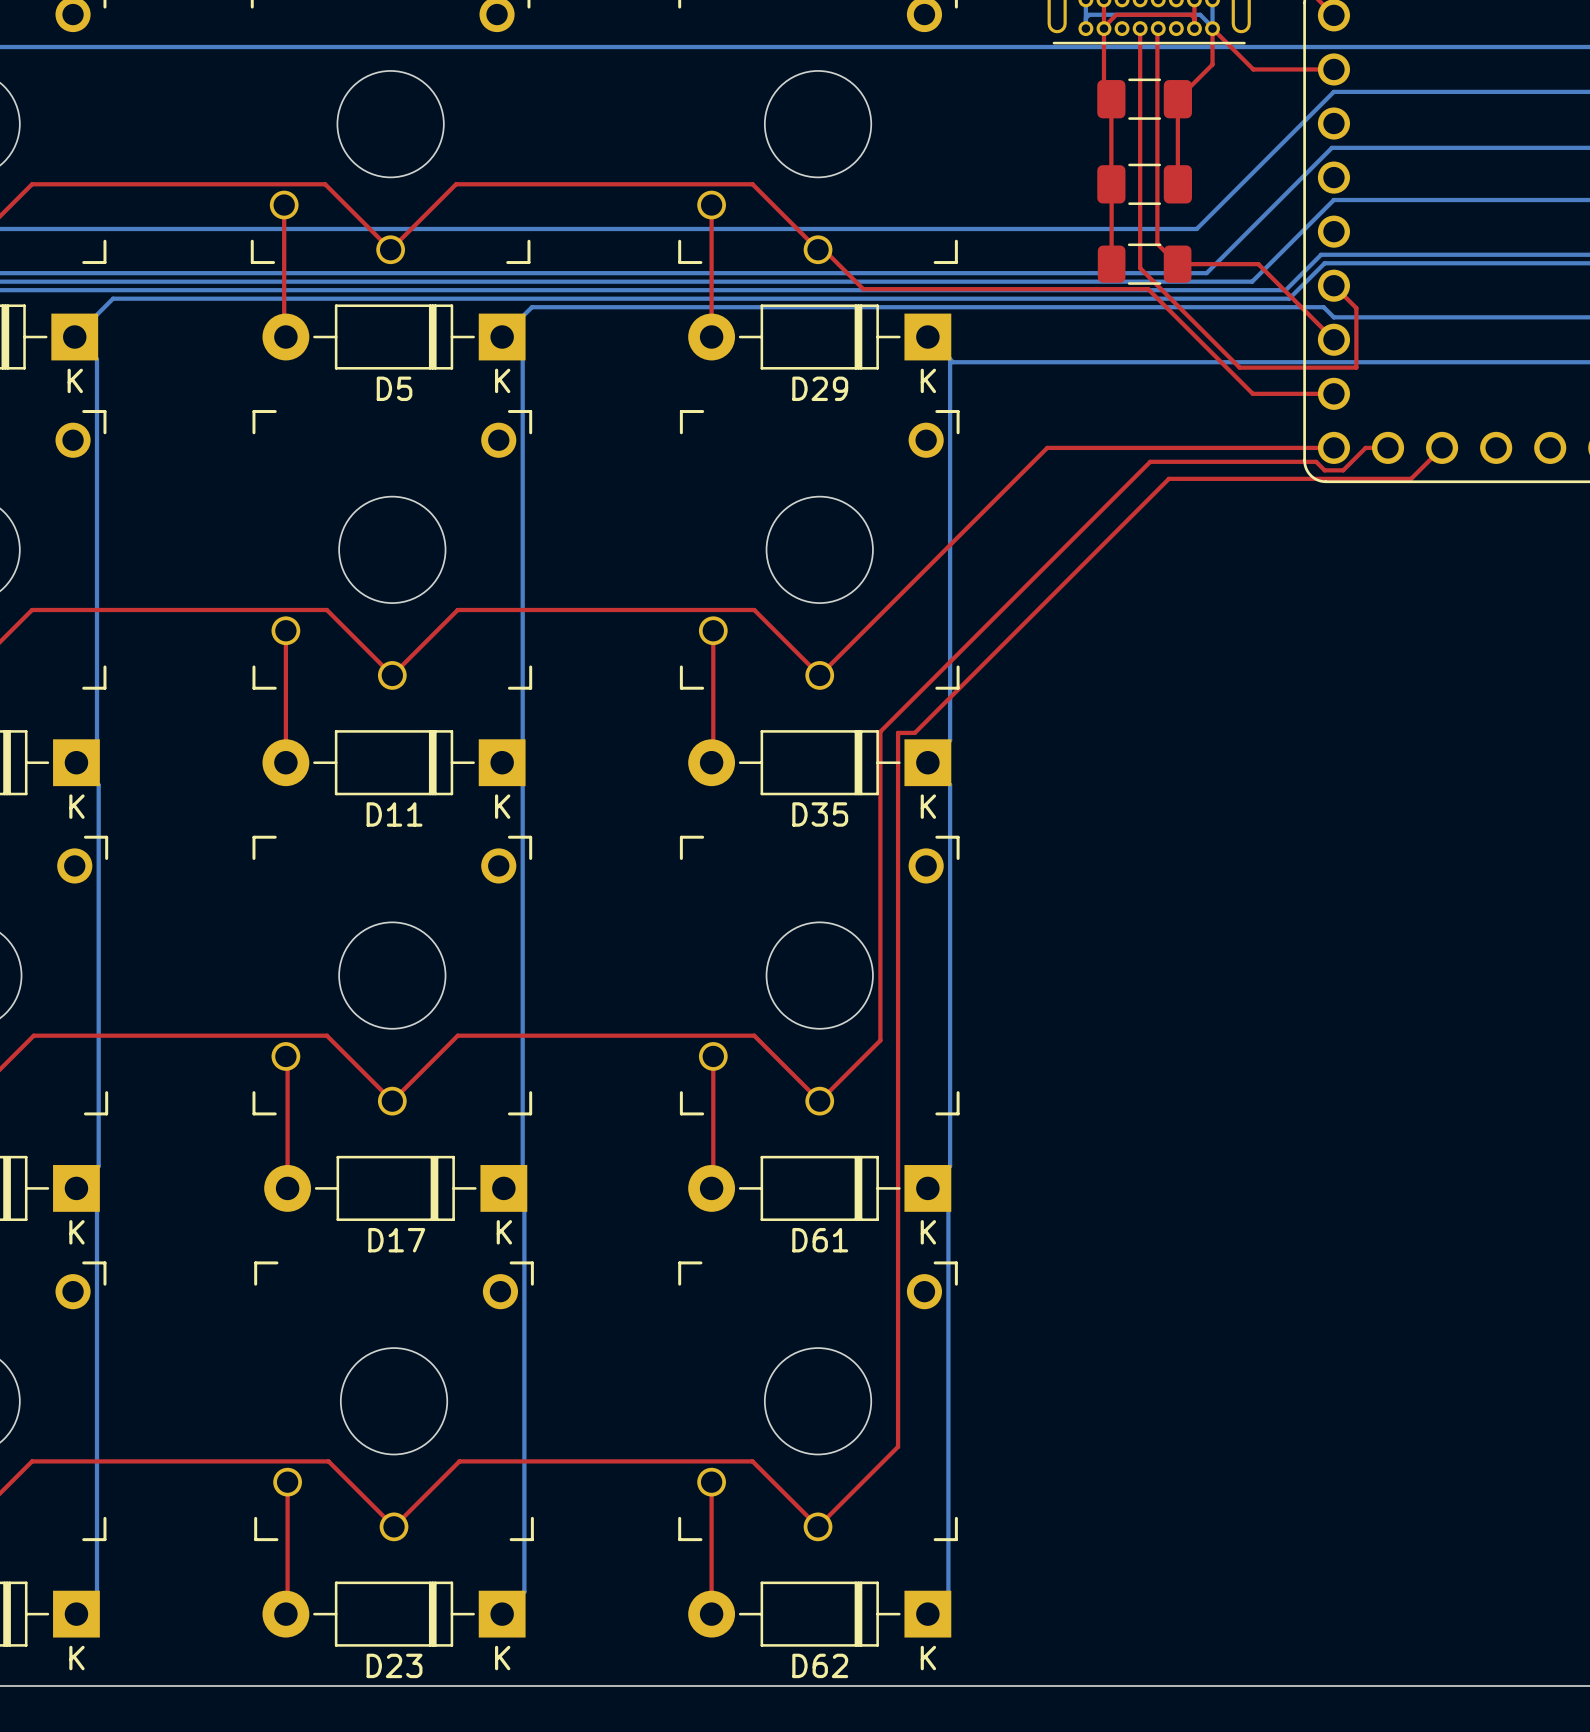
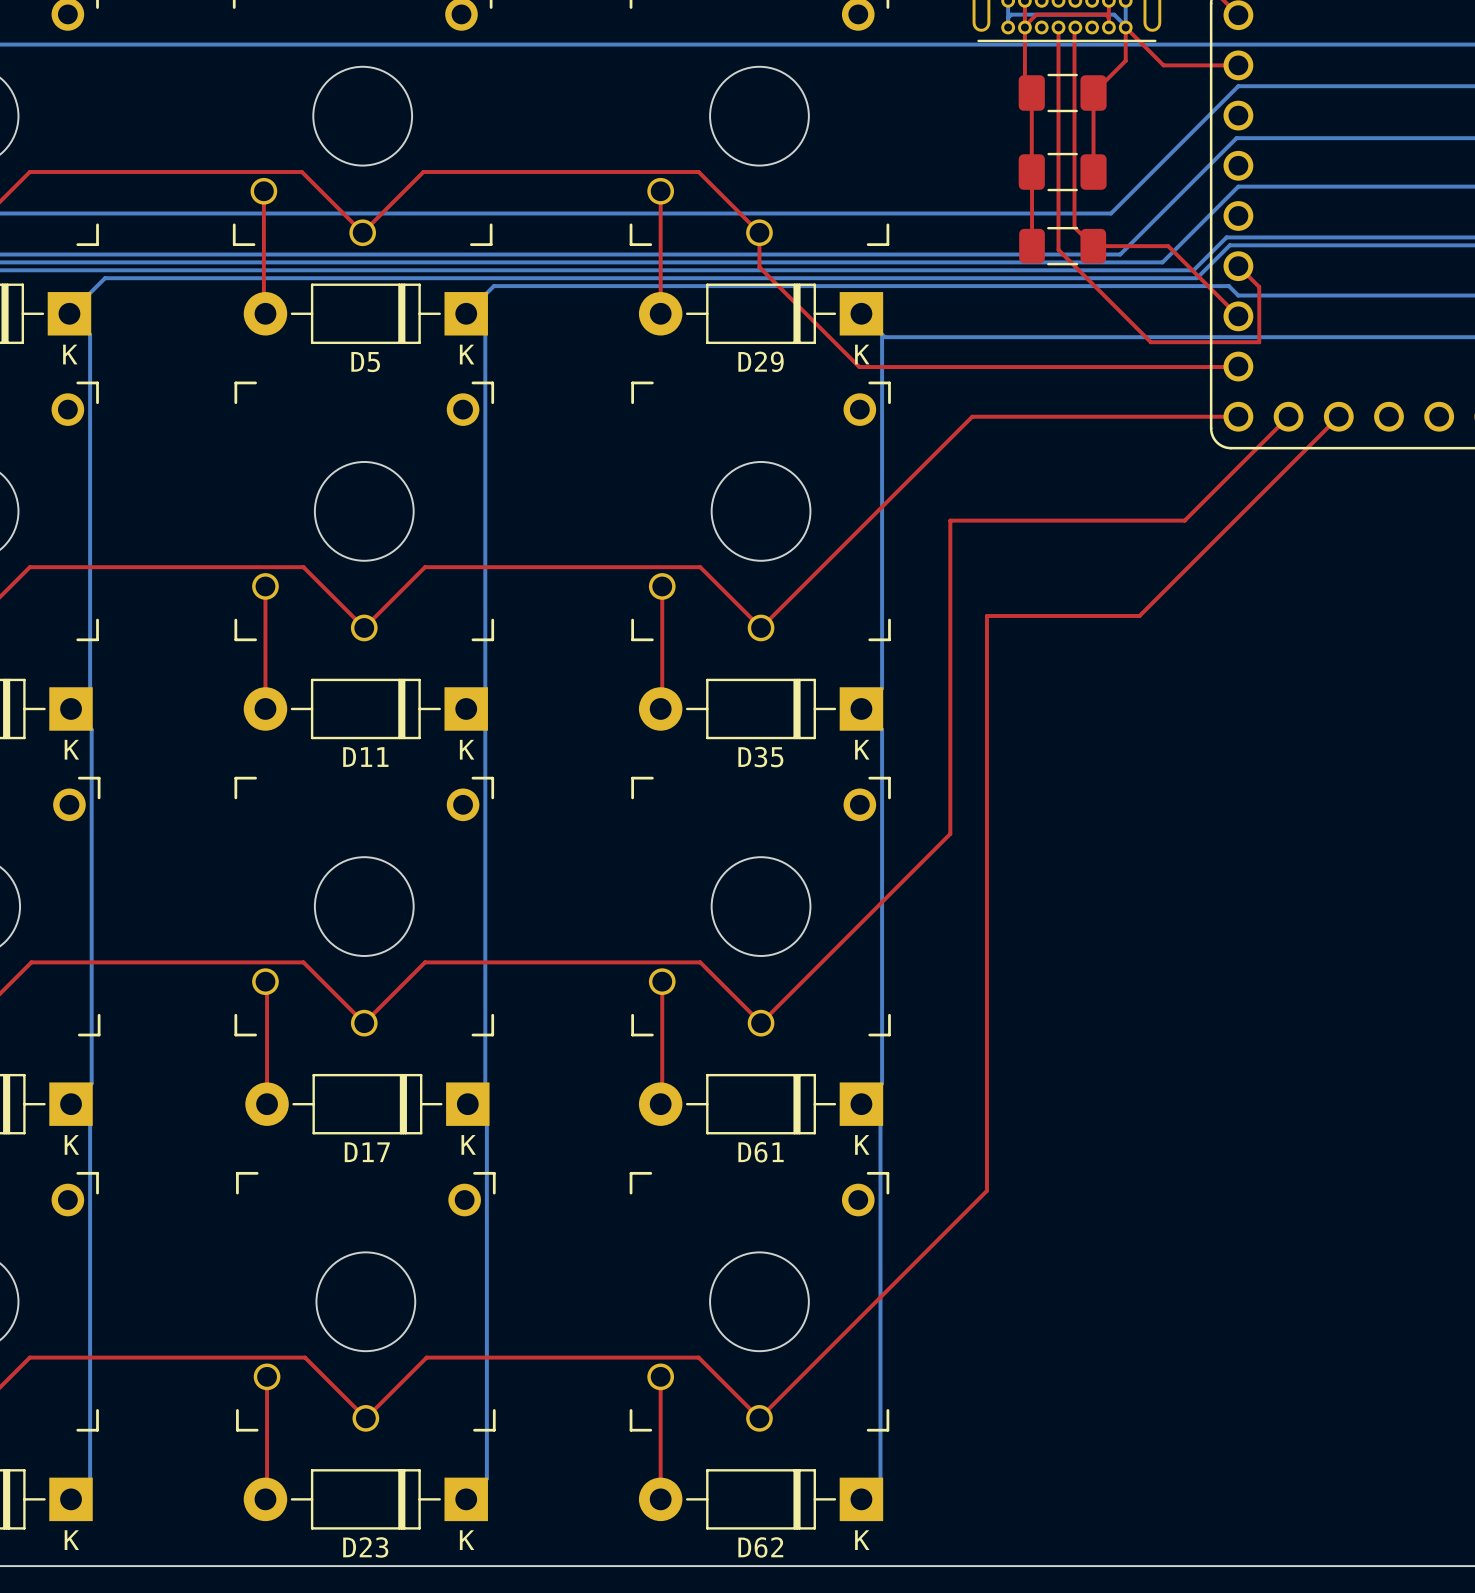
top track: (818, 249) (823, 249) (863, 289) (1148, 289) (1252, 393) (1333, 393) -> (759, 232) (759, 267) (859, 367) (1238, 366)
top track: (1388, 447) (1365, 447) (1343, 470) (1324, 470) (1316, 461) (1150, 461) (880, 731) (880, 1040) -> (1288, 416) (1184, 520) (950, 520) (950, 833) (817, 966)
top track: (1411, 478) (1168, 478) (914, 732) (898, 732) (898, 1446) -> (1310, 445) (1139, 615) (986, 615) (986, 1190) (833, 1344)

